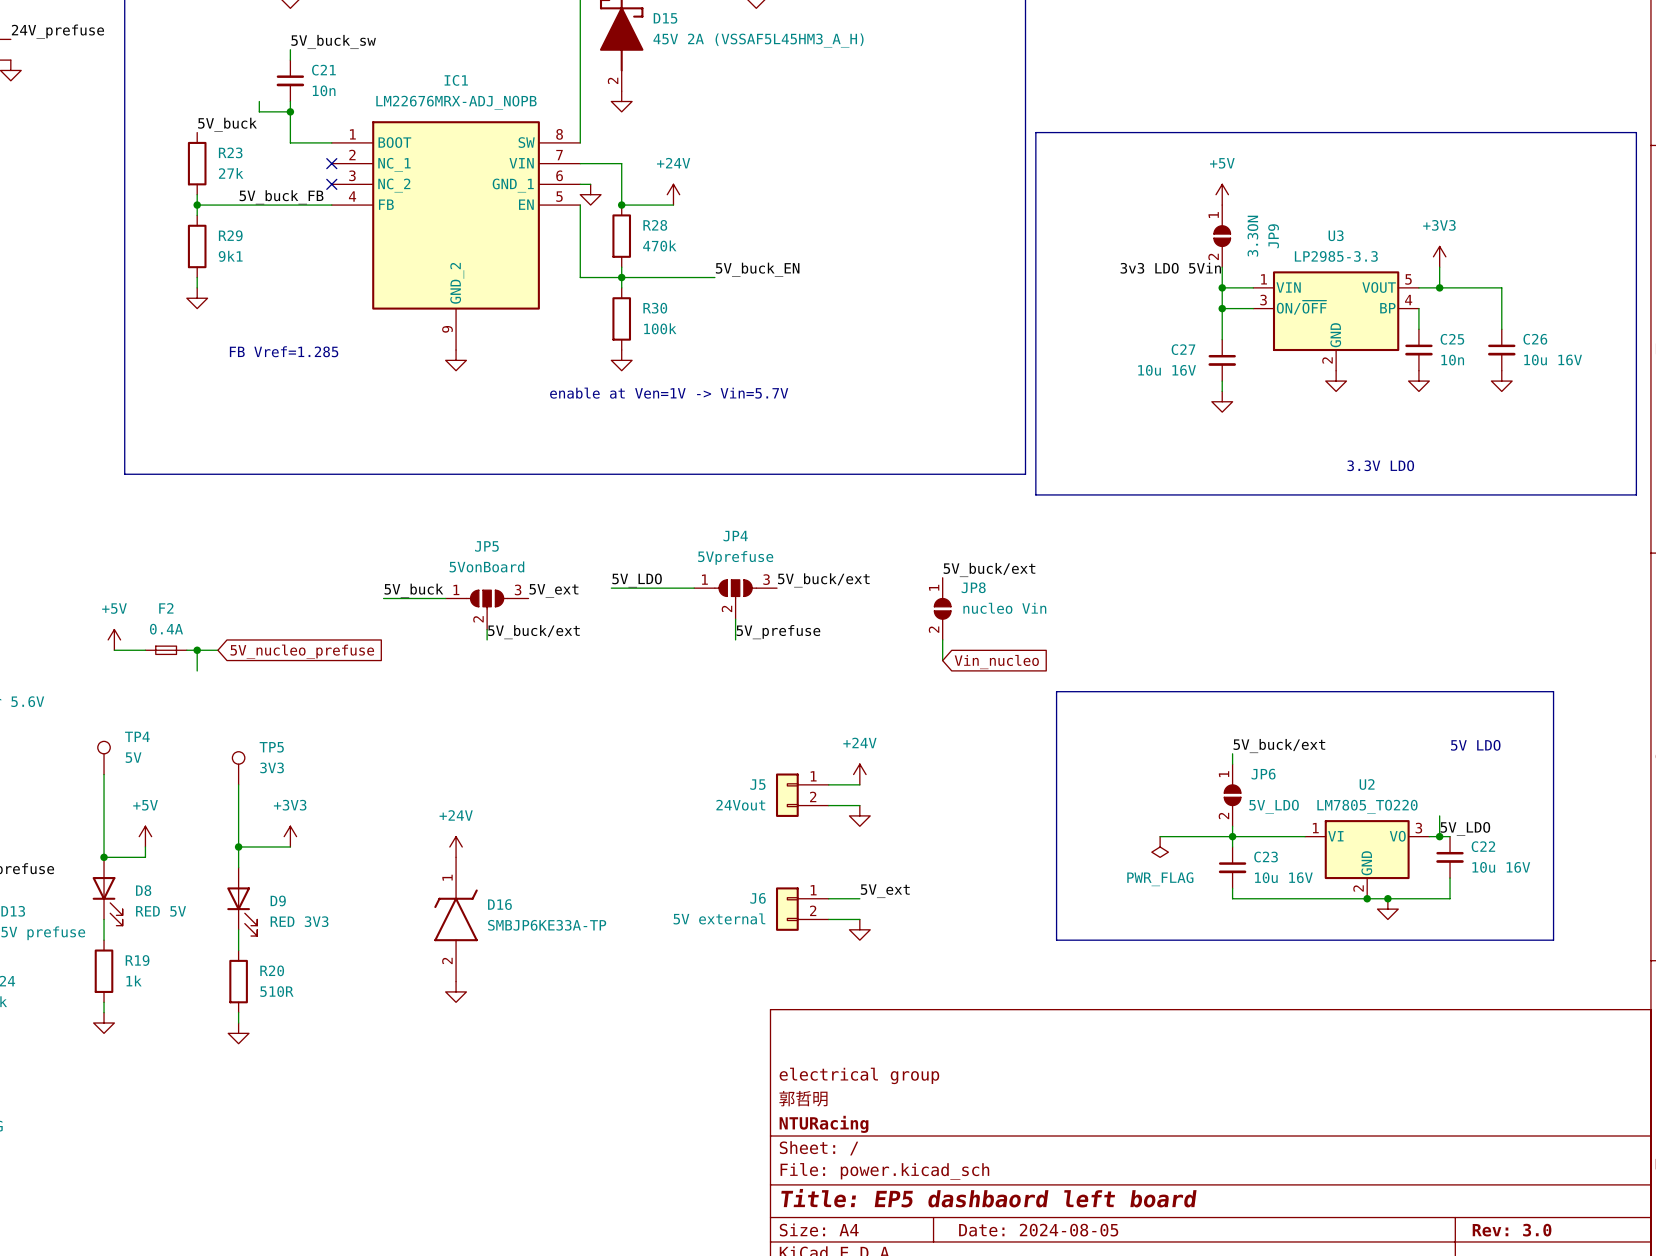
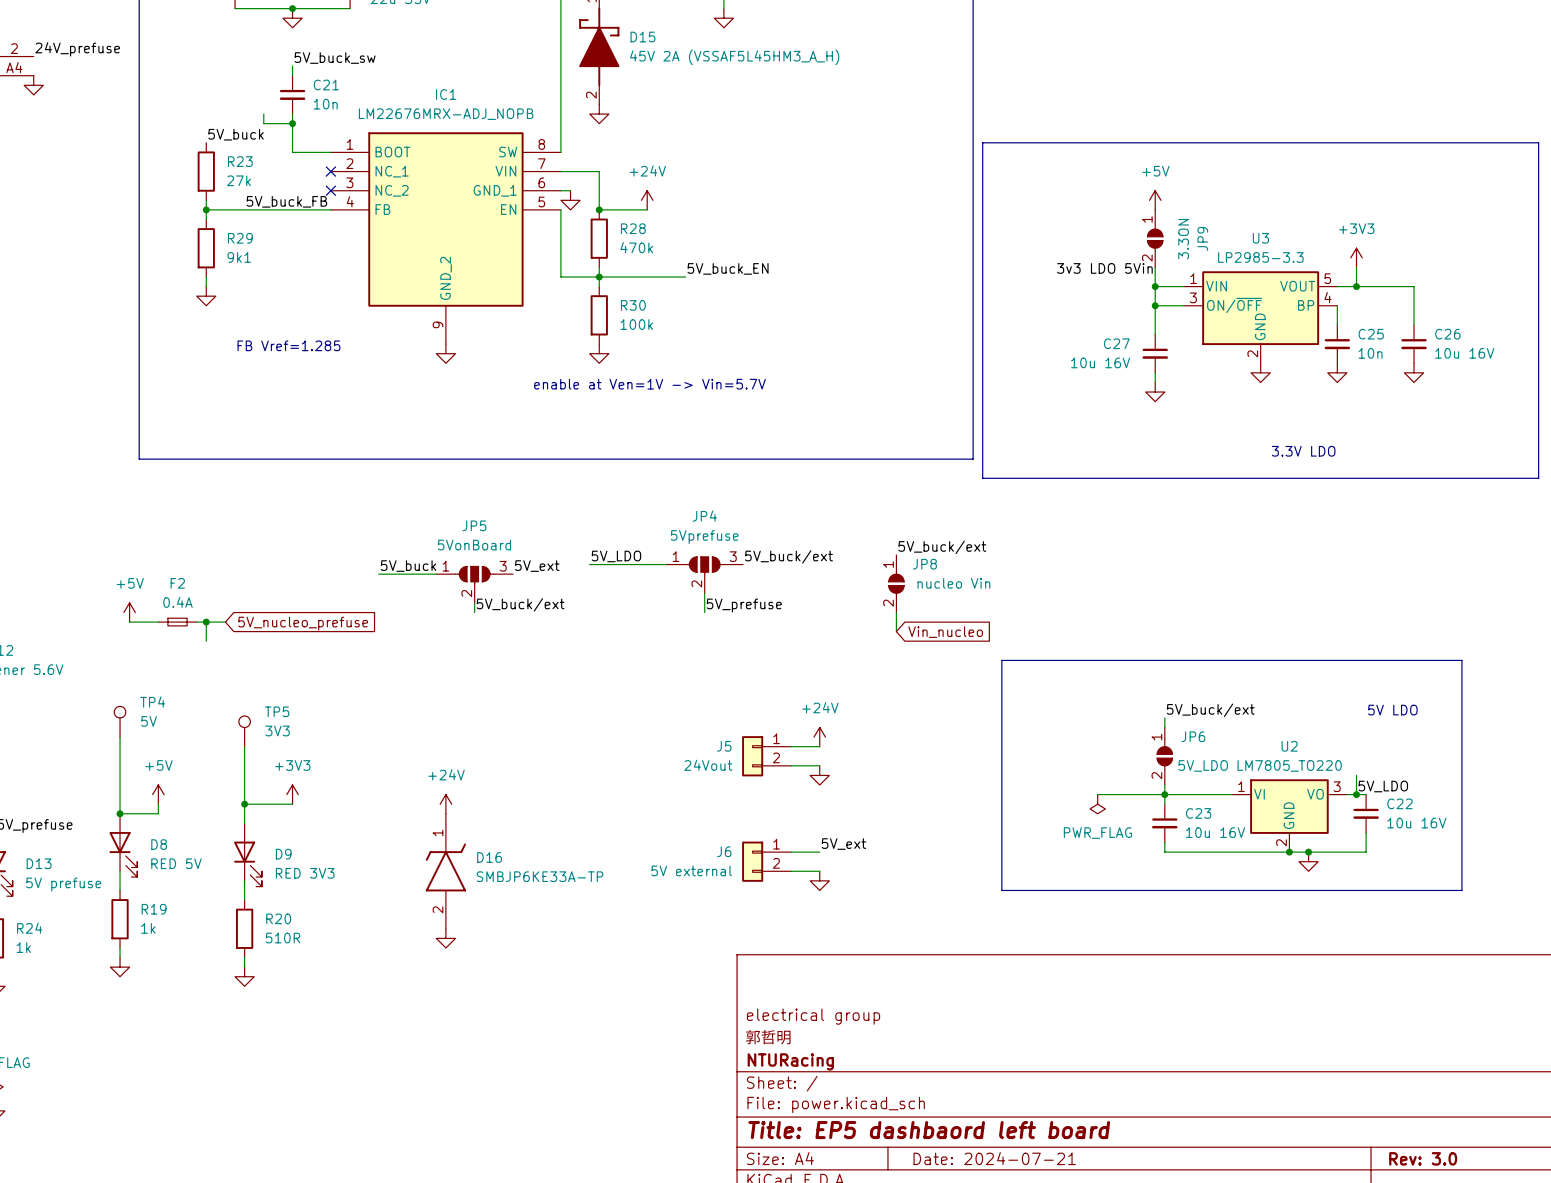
title block: Date: 2024-08-05 (1038, 1230) -> Date: 2024-07-21 (994, 1158)

